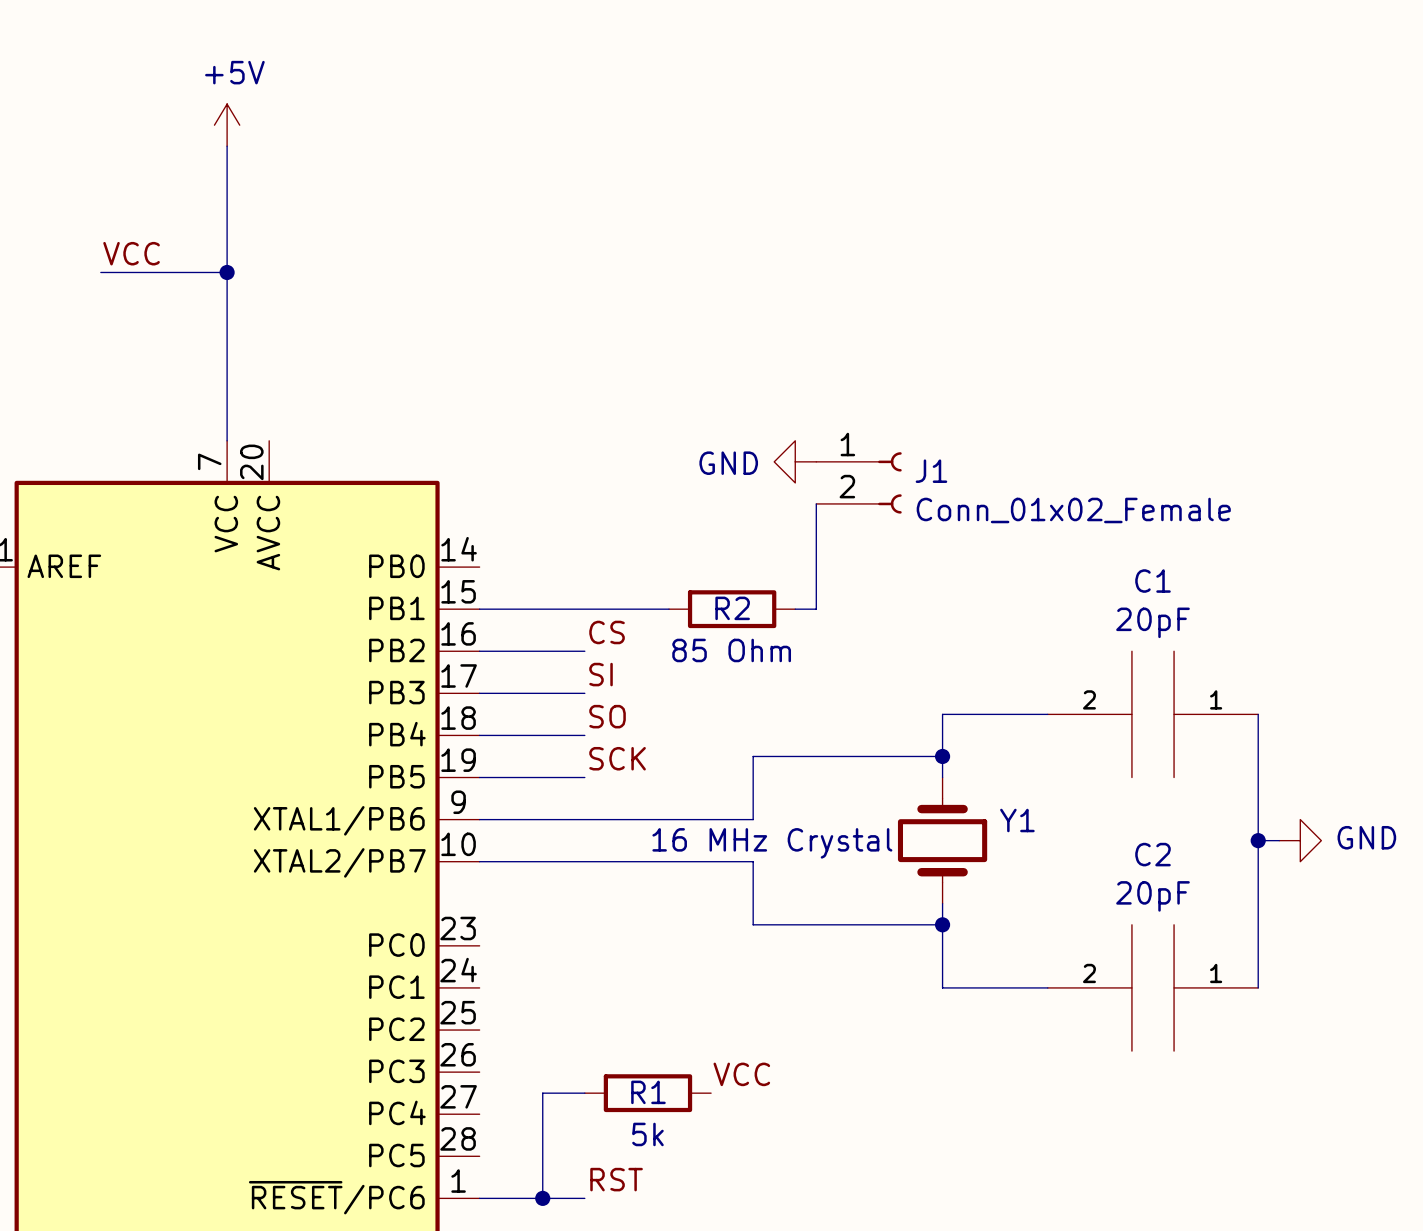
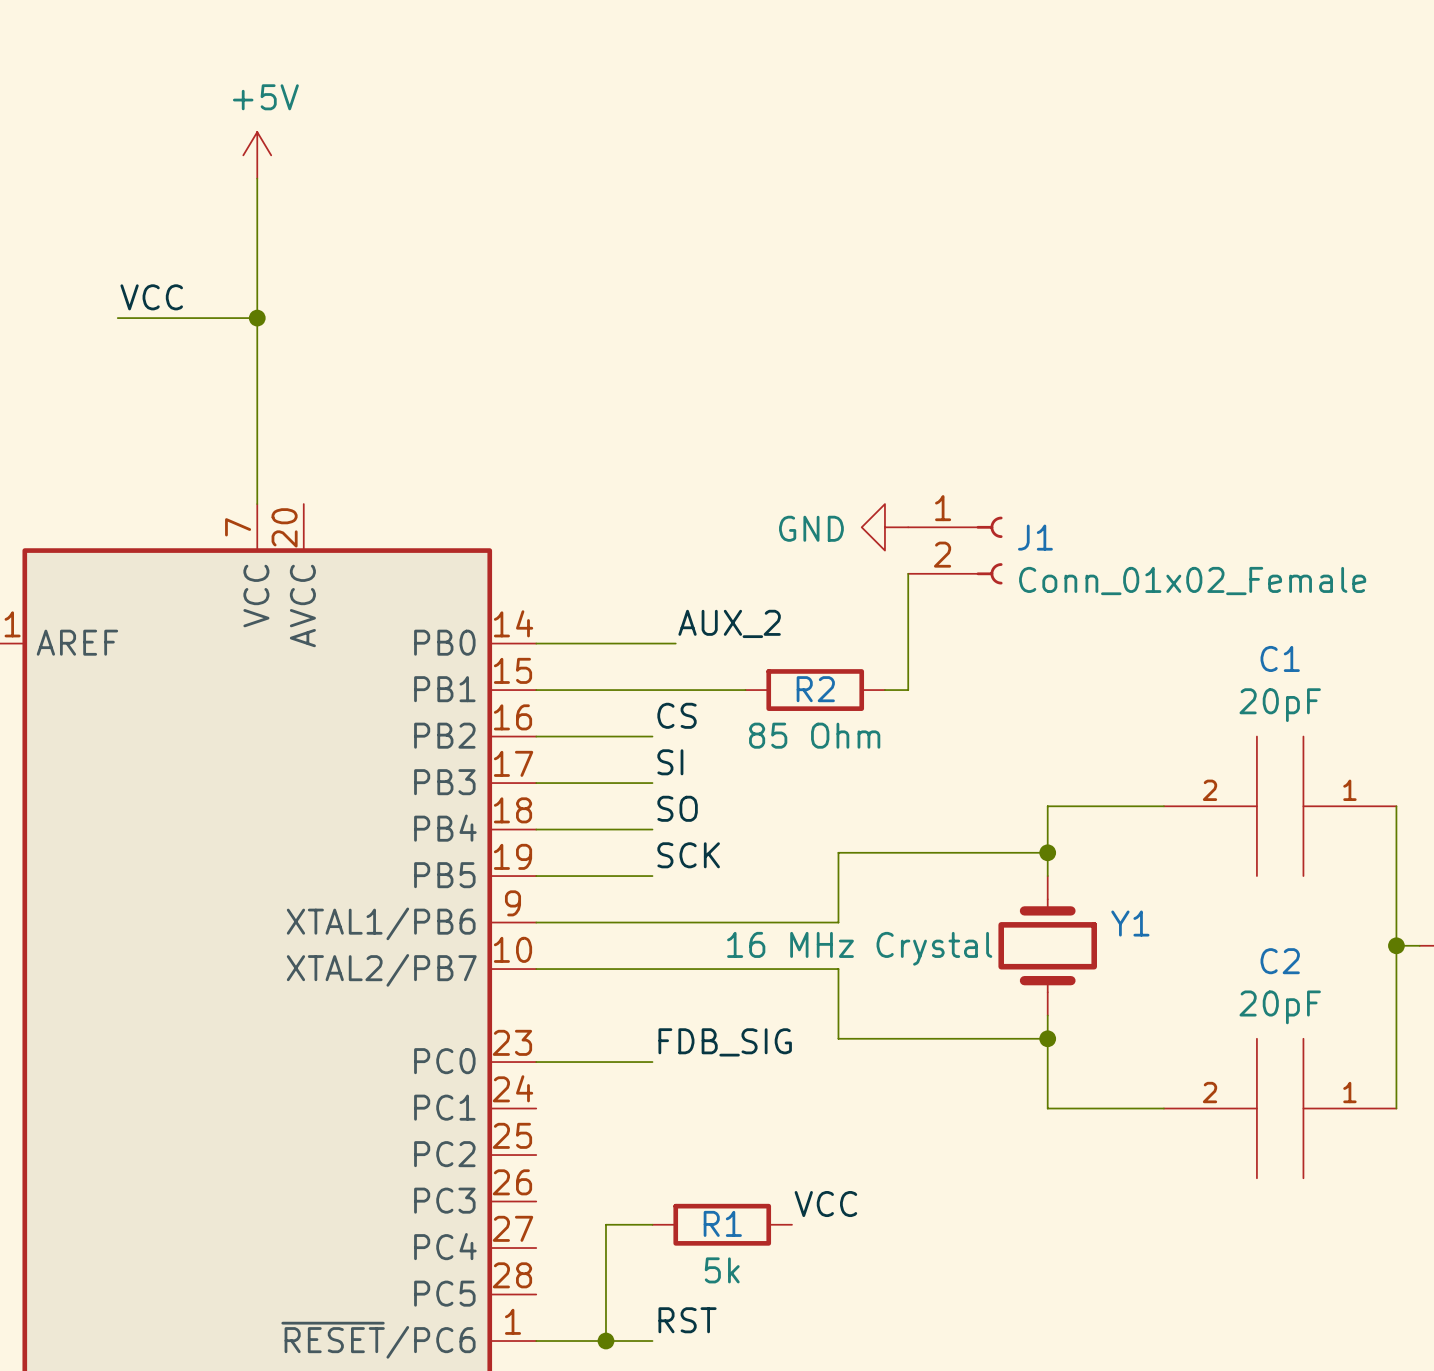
label: none -> AUX_2 (729, 623)
wire: none -> (536, 643) (675, 643)
label: none -> FDB_SIG (725, 1042)
wire: none -> (536, 1062) (652, 1062)

